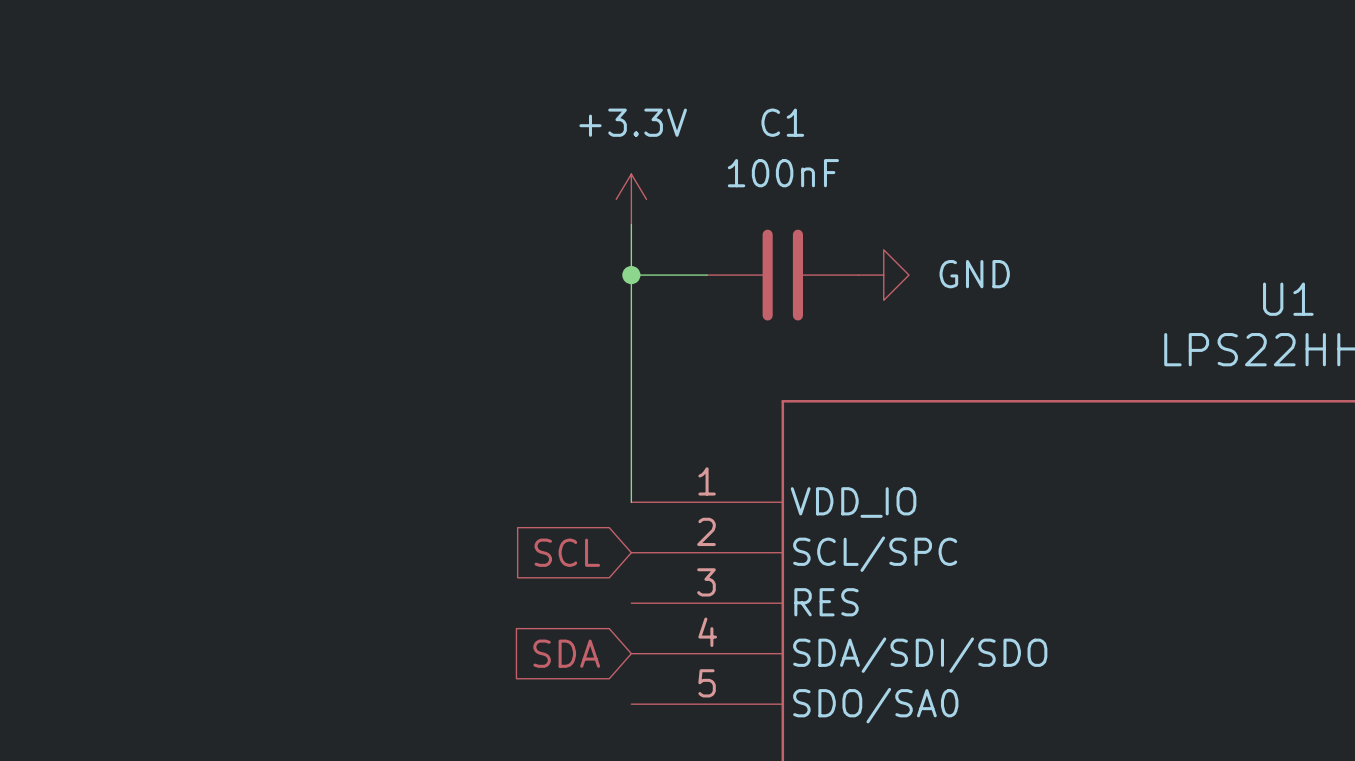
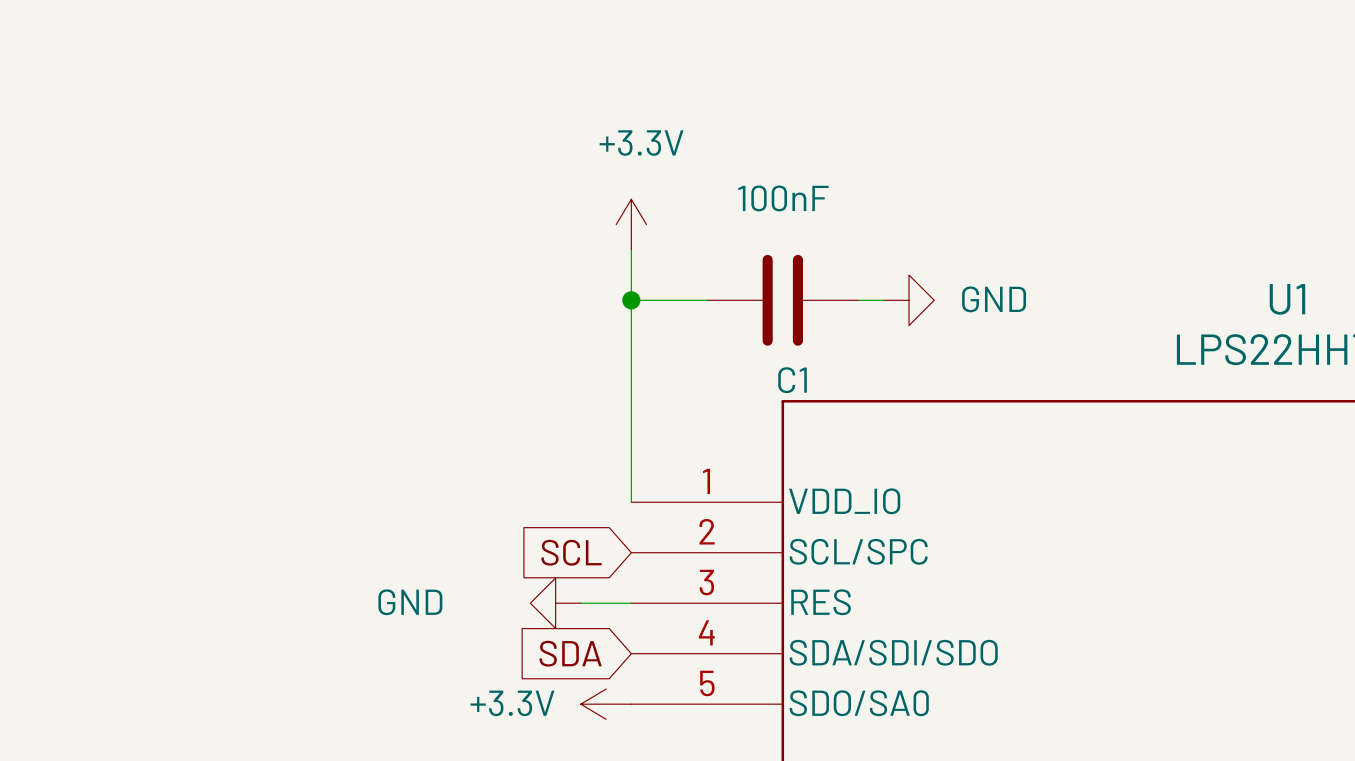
power symbol text position: +3.3V (633, 122) -> +3.3V (641, 143)
C1 name position: C1 (782, 122) -> C1 (792, 380)
power symbol position: +3.3V (631, 199) -> +3.3V (631, 224)
wire: (631, 275) (707, 275) -> (631, 300) (707, 300)
junction position: (631, 275) -> (631, 300)
C1 position: (782, 275) -> (782, 300)
power symbol position: GND (883, 275) -> GND (909, 300)
wire: none -> (858, 300) (883, 300)
power symbol: none -> GND (555, 603)
wire: none -> (580, 603) (631, 603)
power symbol: none -> +3.3V (606, 704)

